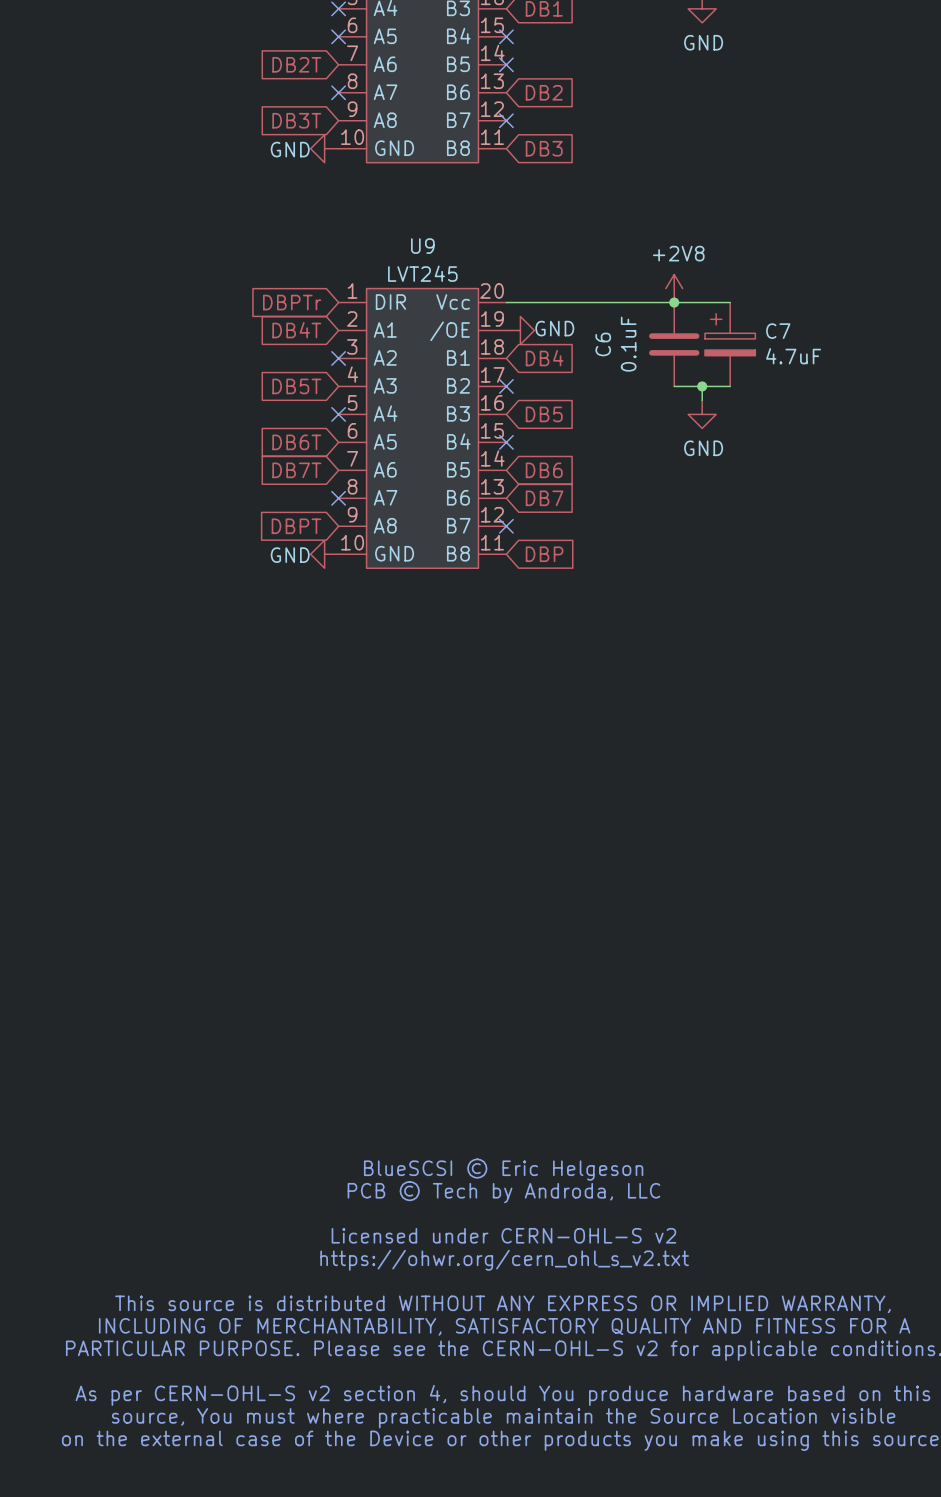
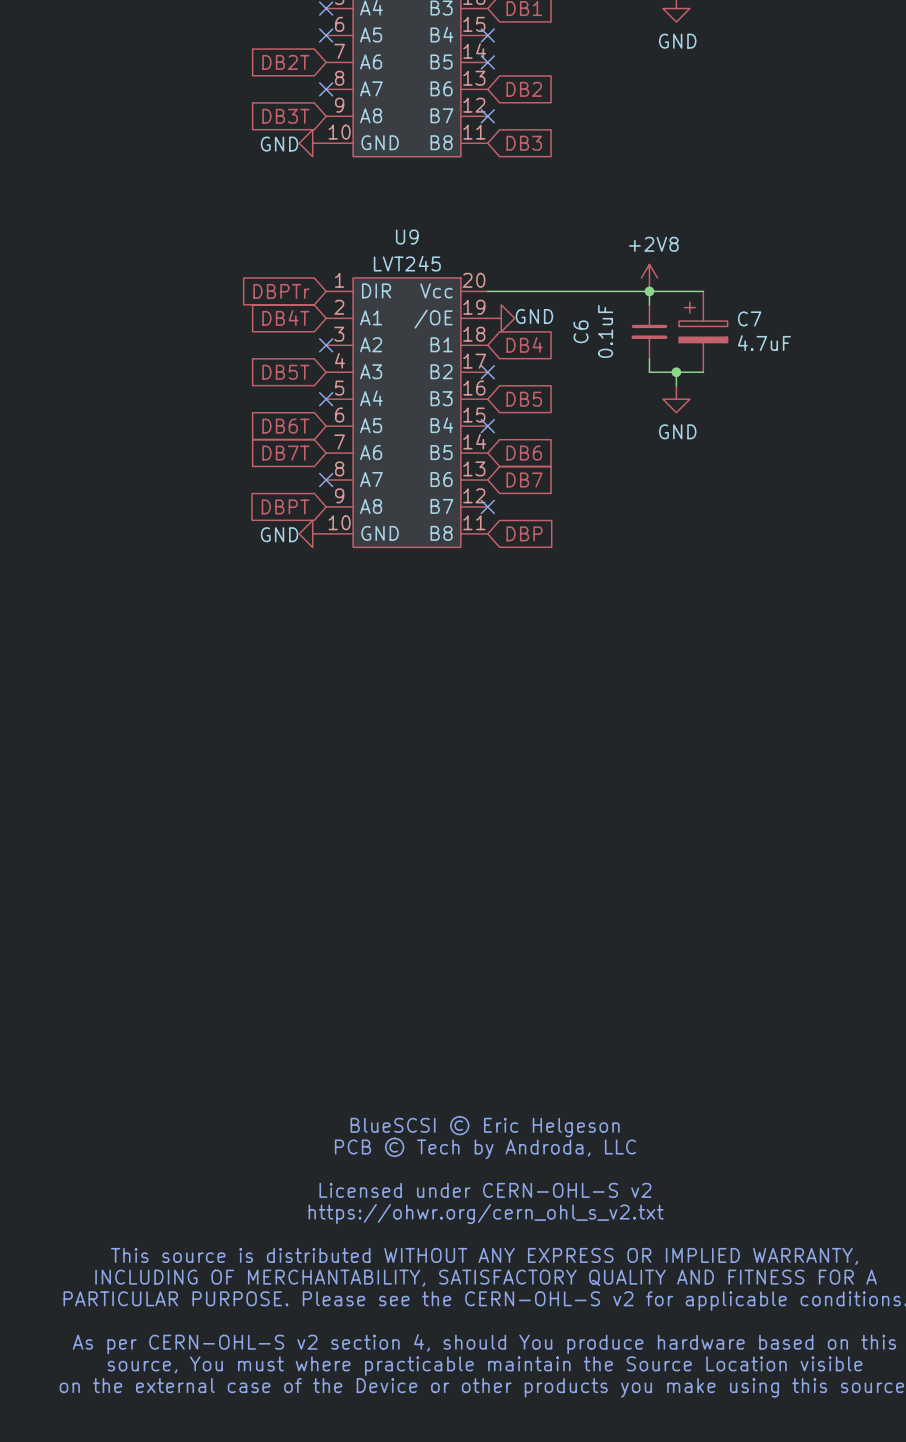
C6 symbol: [649, 302, 700, 387] -> [631, 304, 668, 359]

